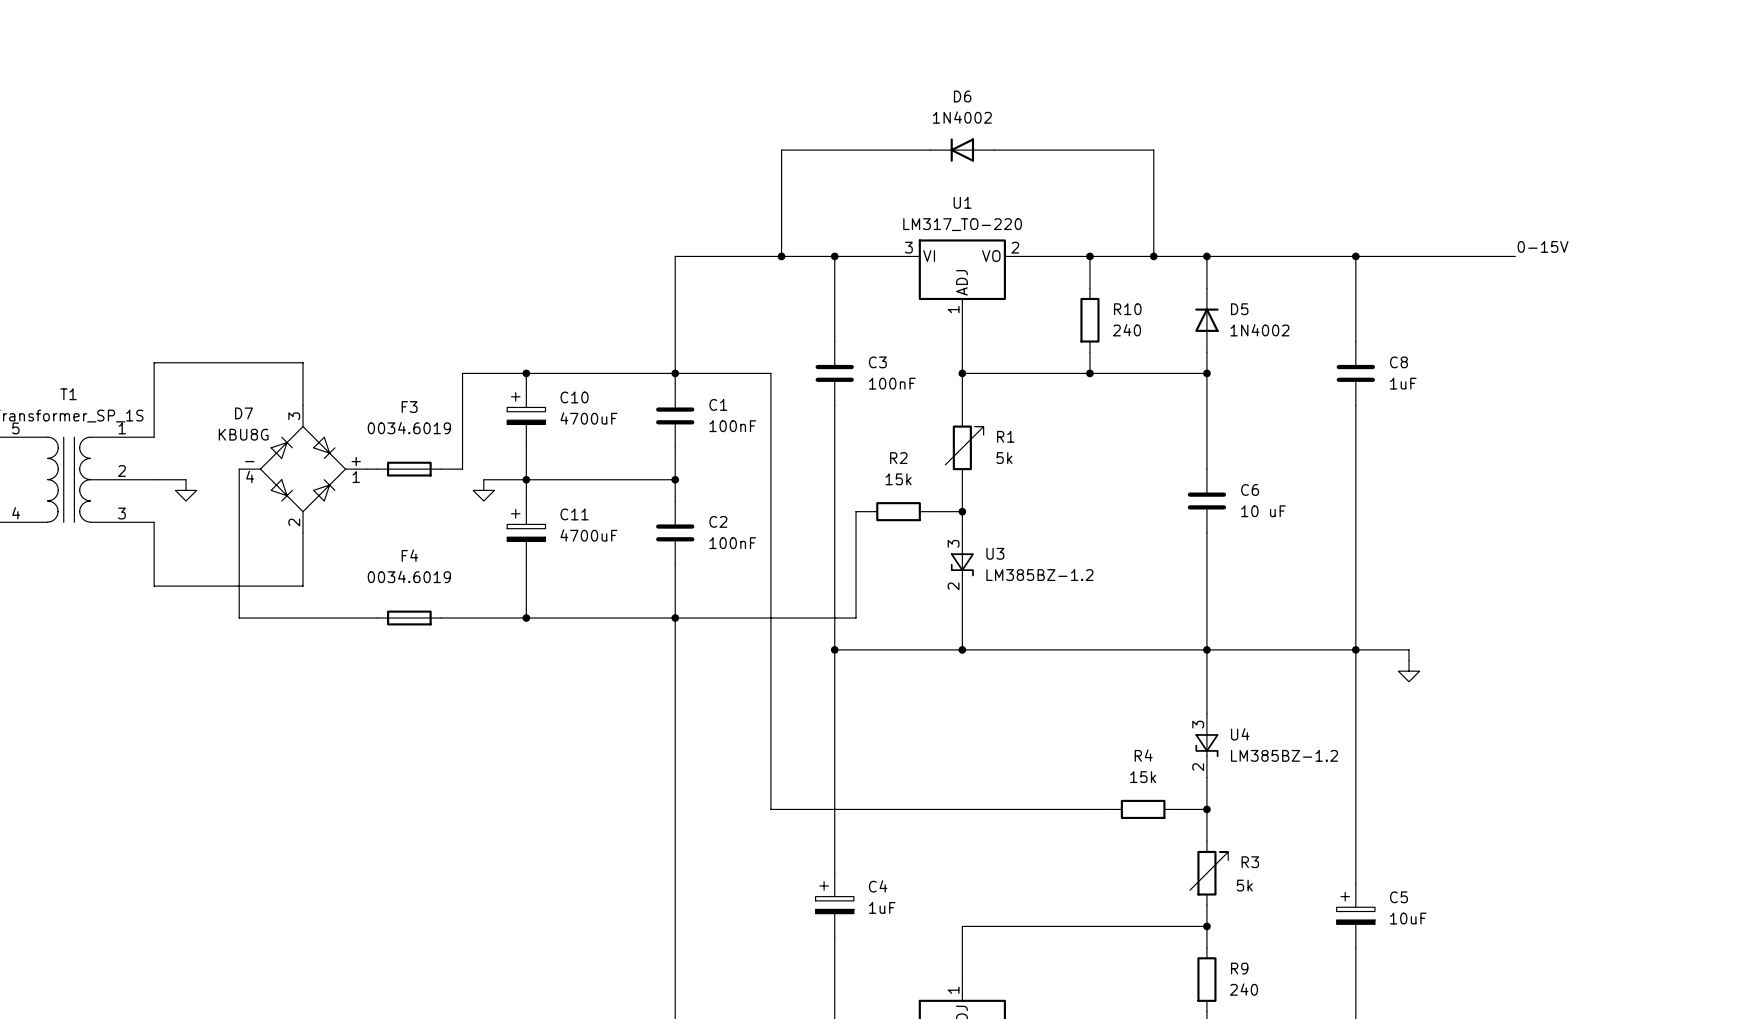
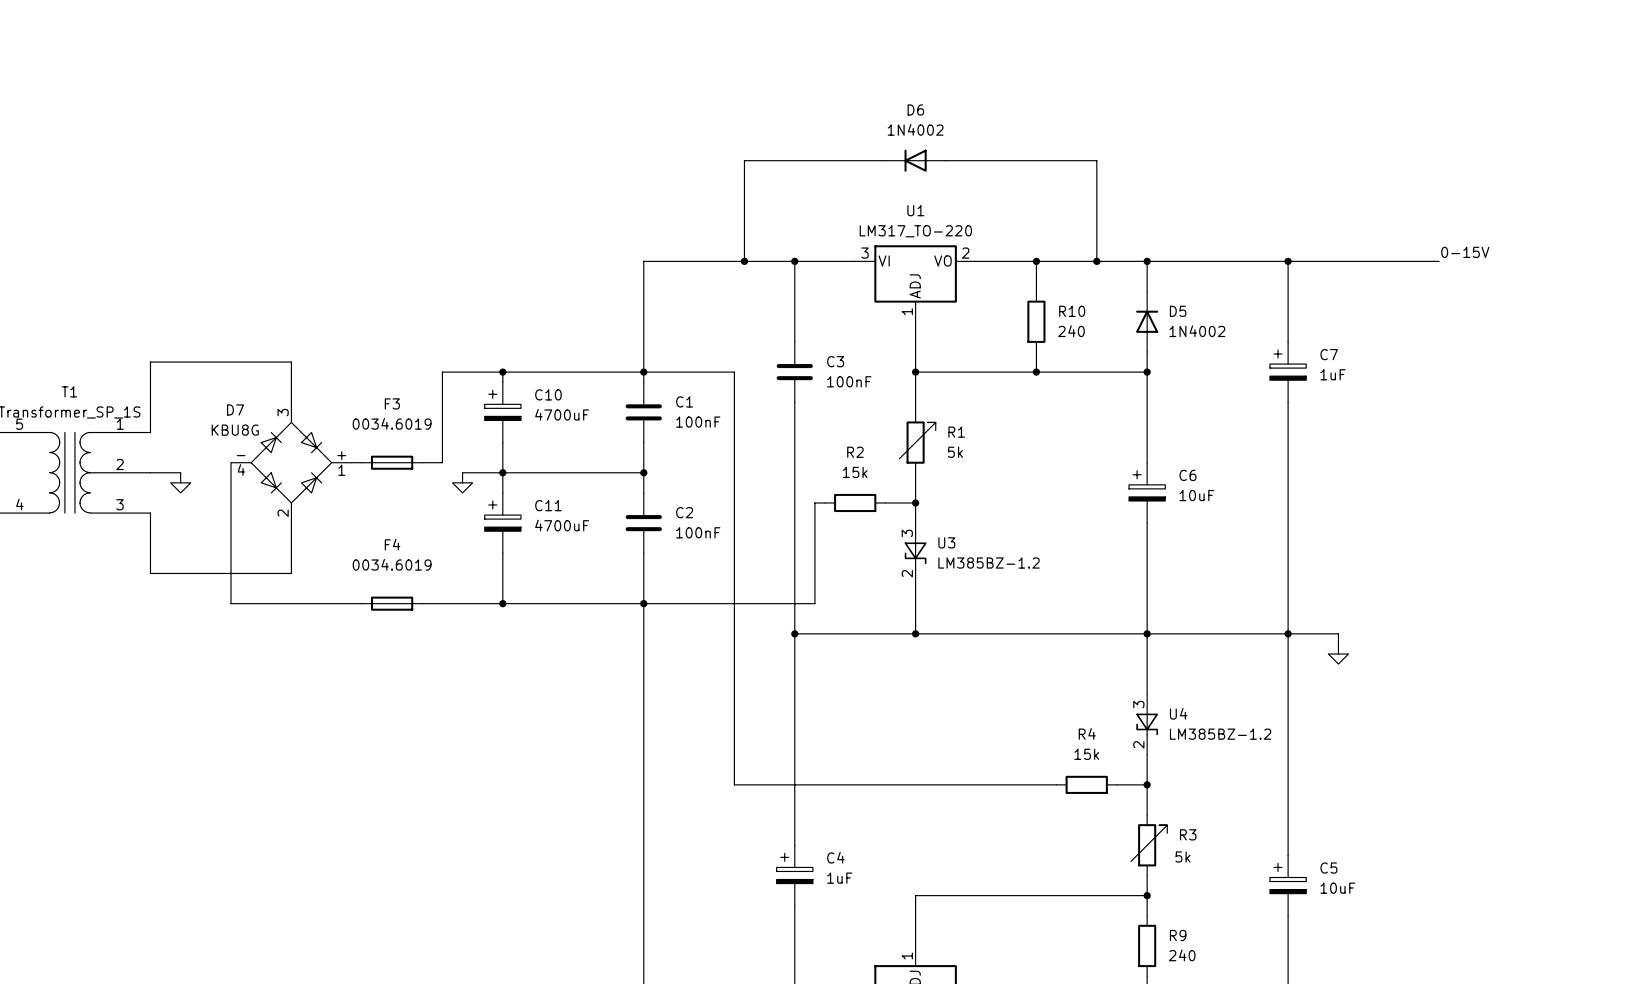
C8: 1uF (1355, 373) -> none
C7: none -> 1uF (1288, 372)
C6 symbol: [1187, 469, 1227, 533] -> [1129, 462, 1166, 524]
C6 value: 10 uF (1263, 511) -> 10uF (1196, 495)

